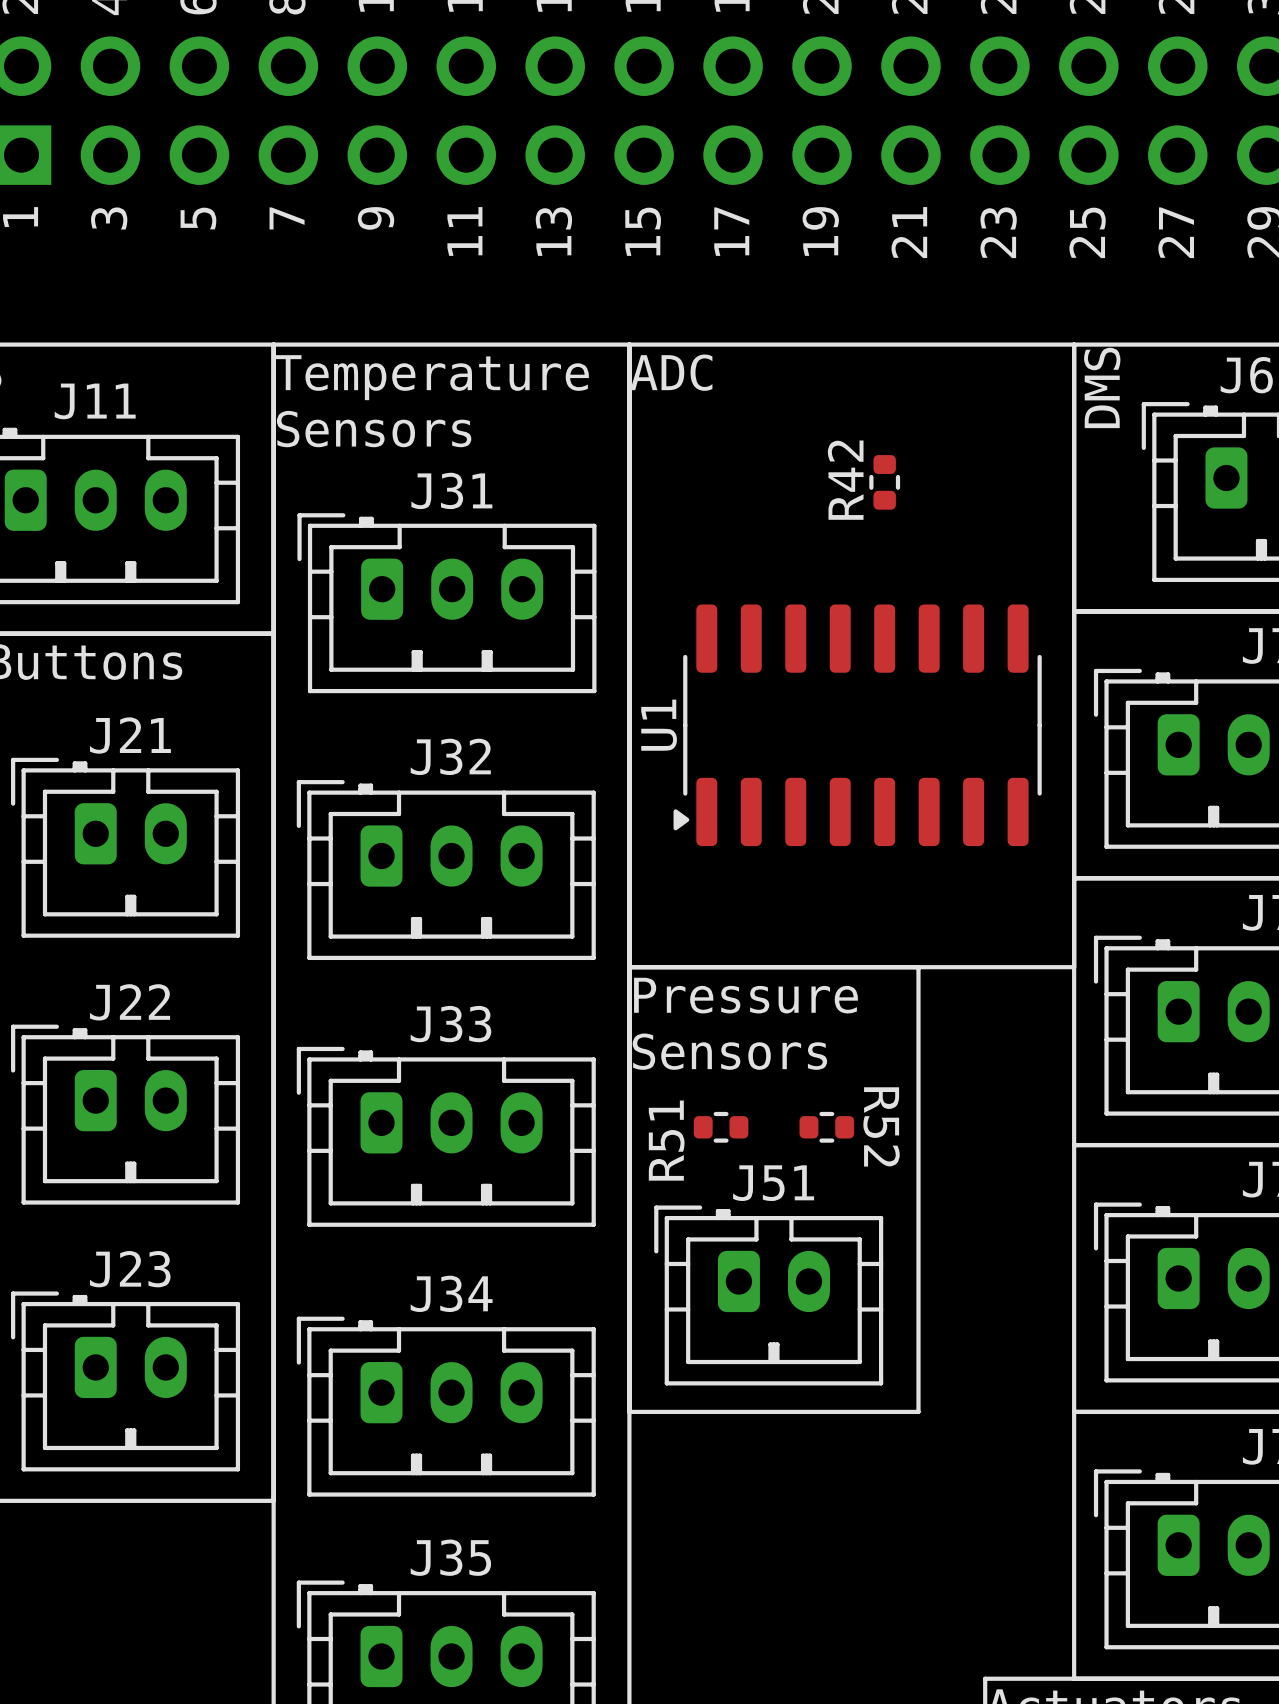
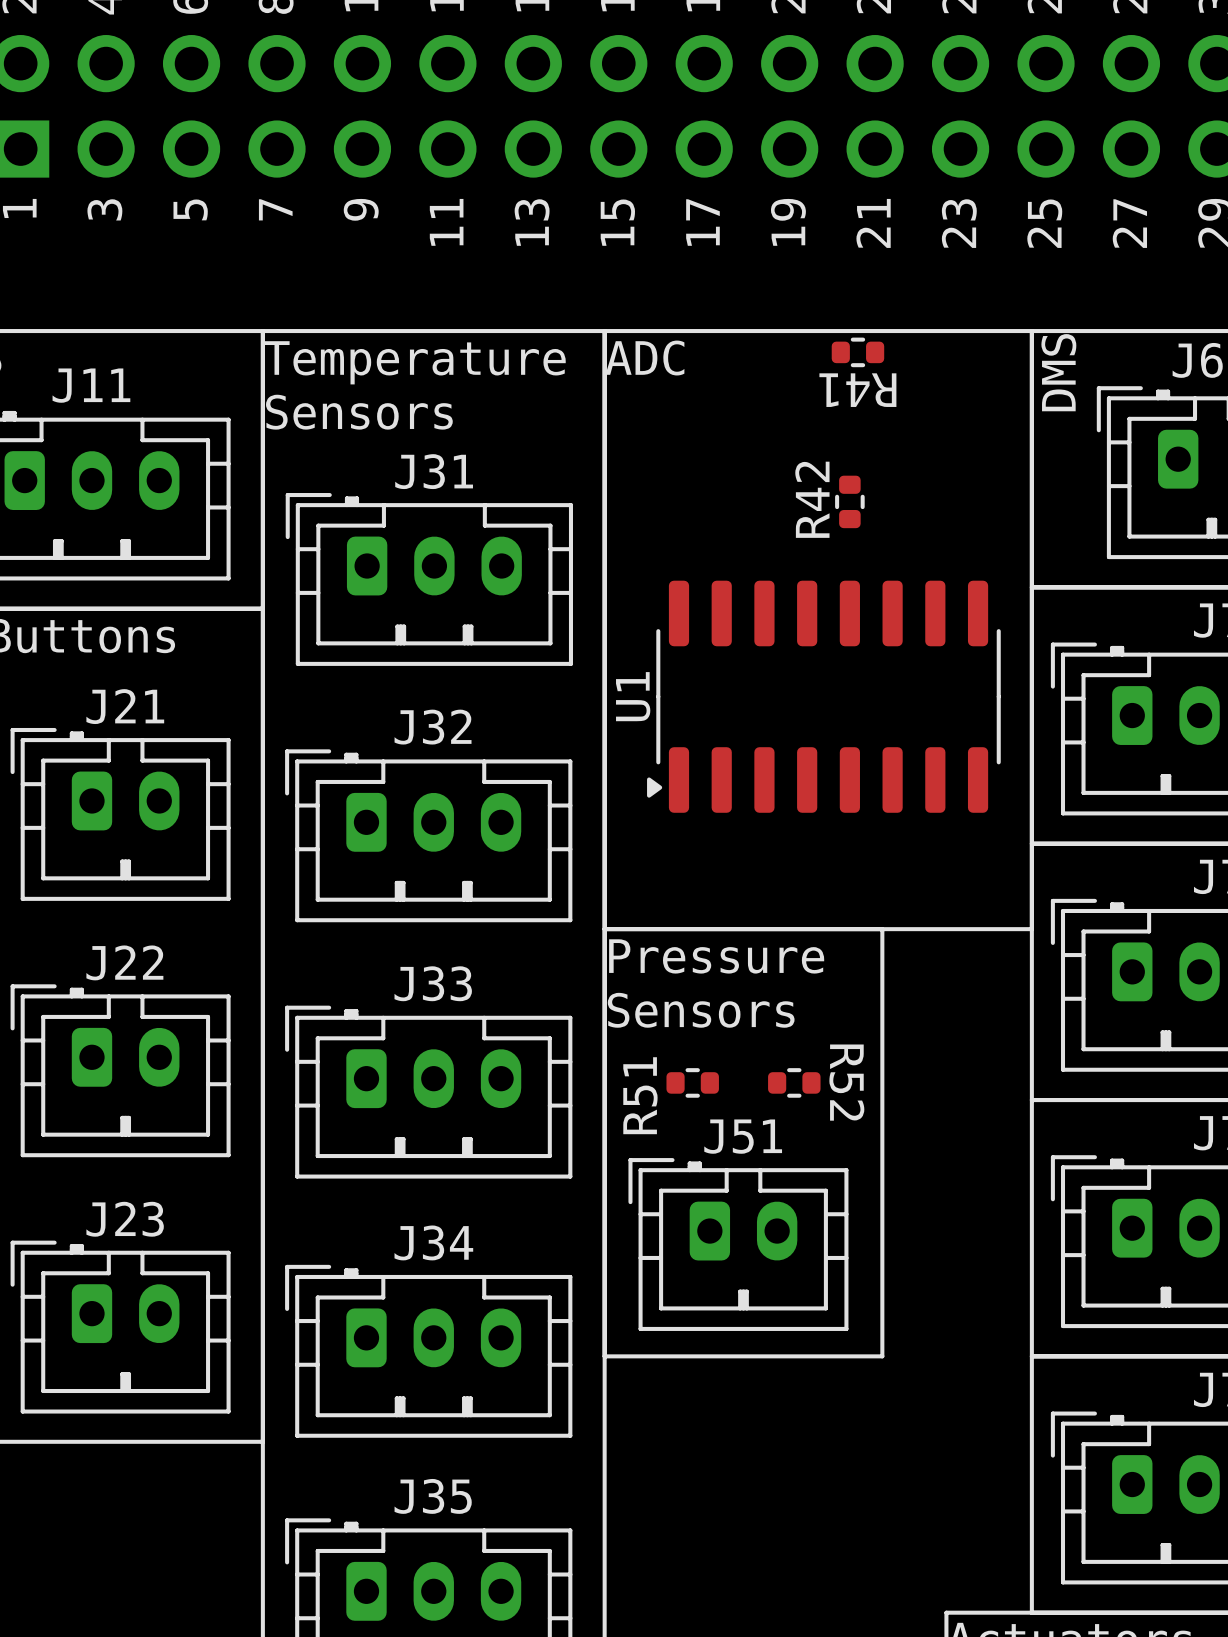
R41: none -> (857, 352)
R42 position: (884, 482) -> (849, 501)

